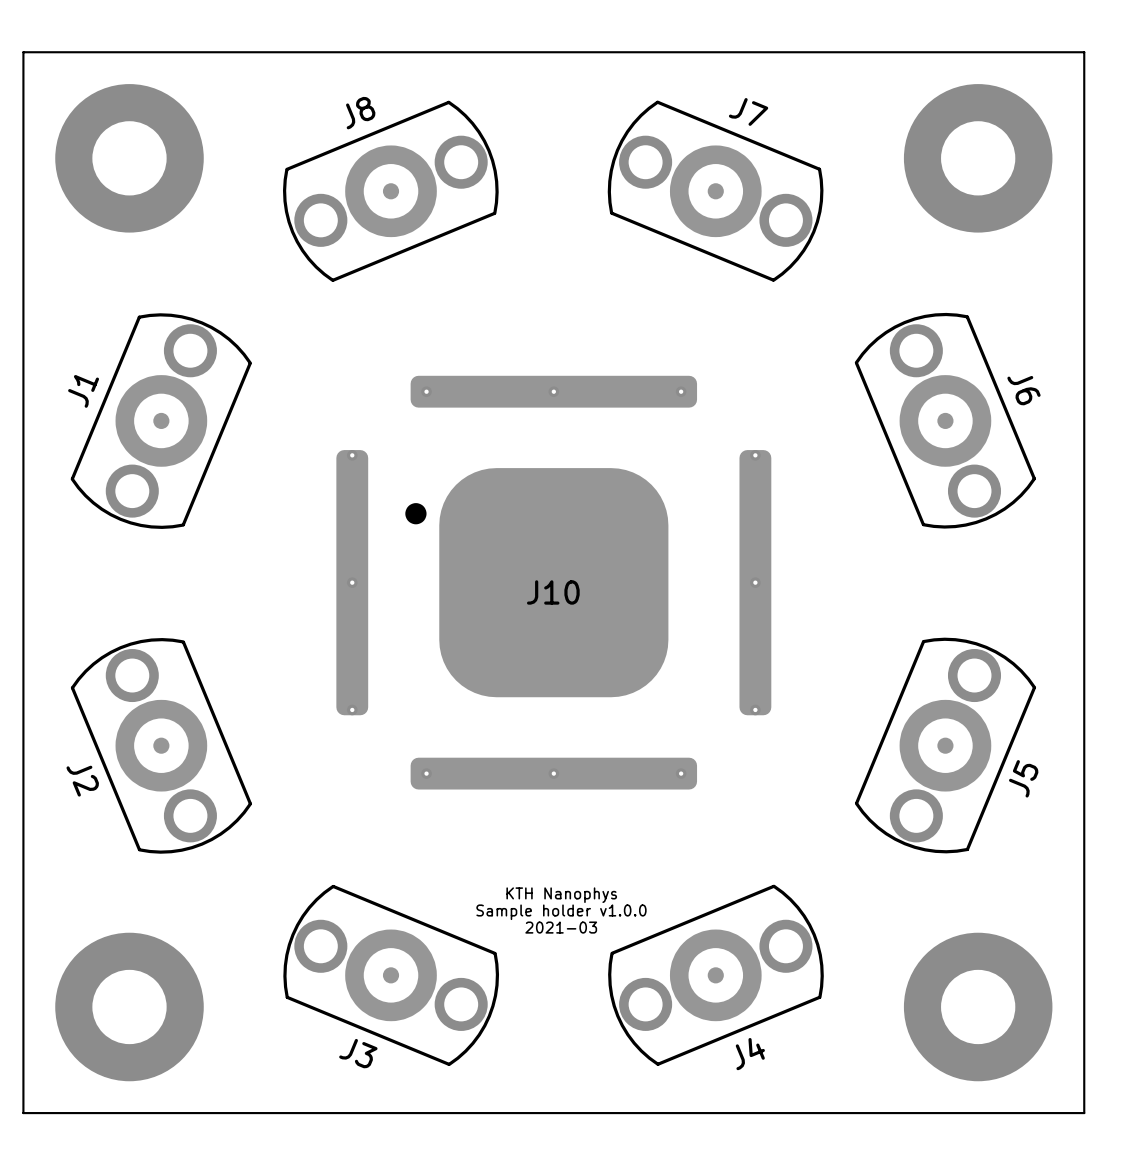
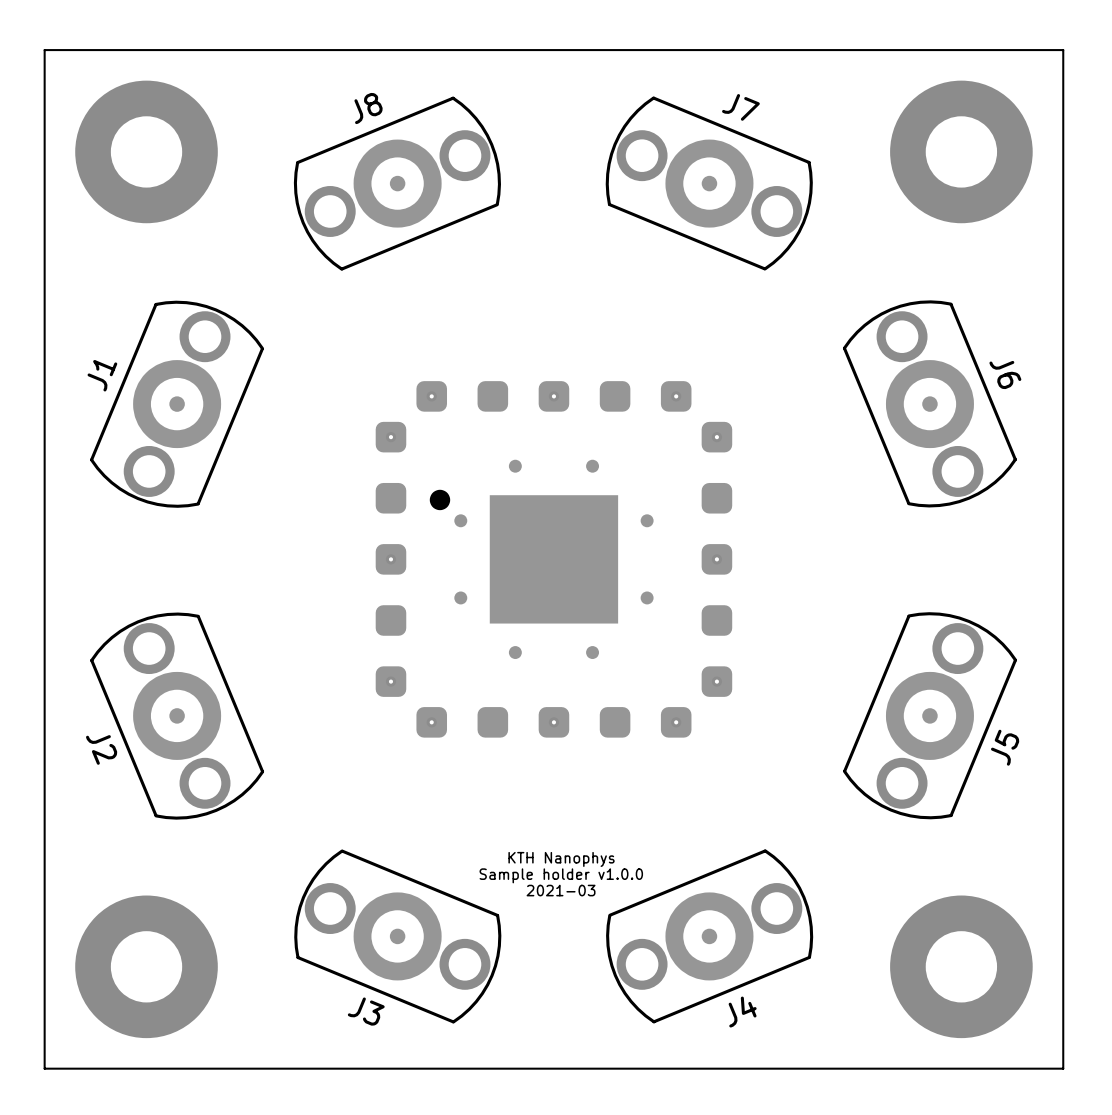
part footprint: [405, 468, 669, 698] -> [429, 459, 654, 660]
J10: (553, 582) -> none
part: none -> (553, 559)

